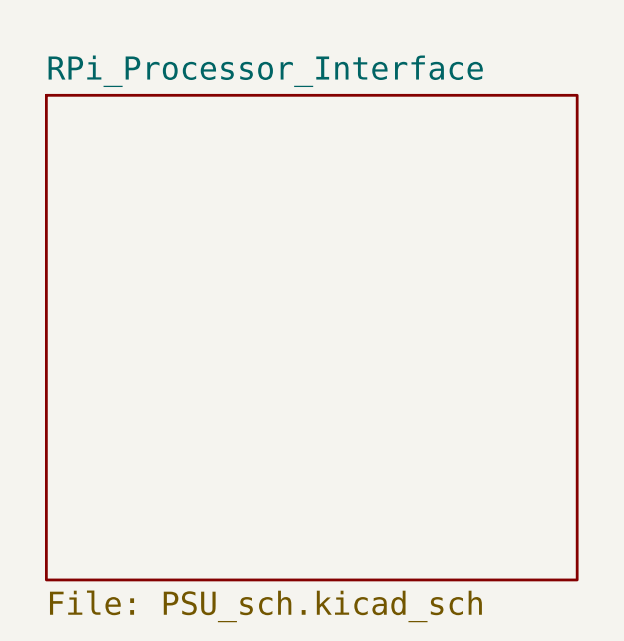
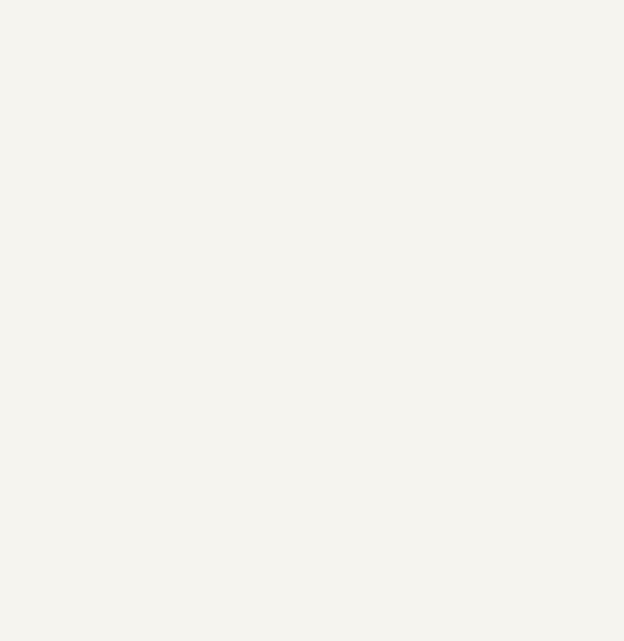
sheet RPi_Processor_Interface: File: PSU_sch.kicad_sch (311, 337) -> none

